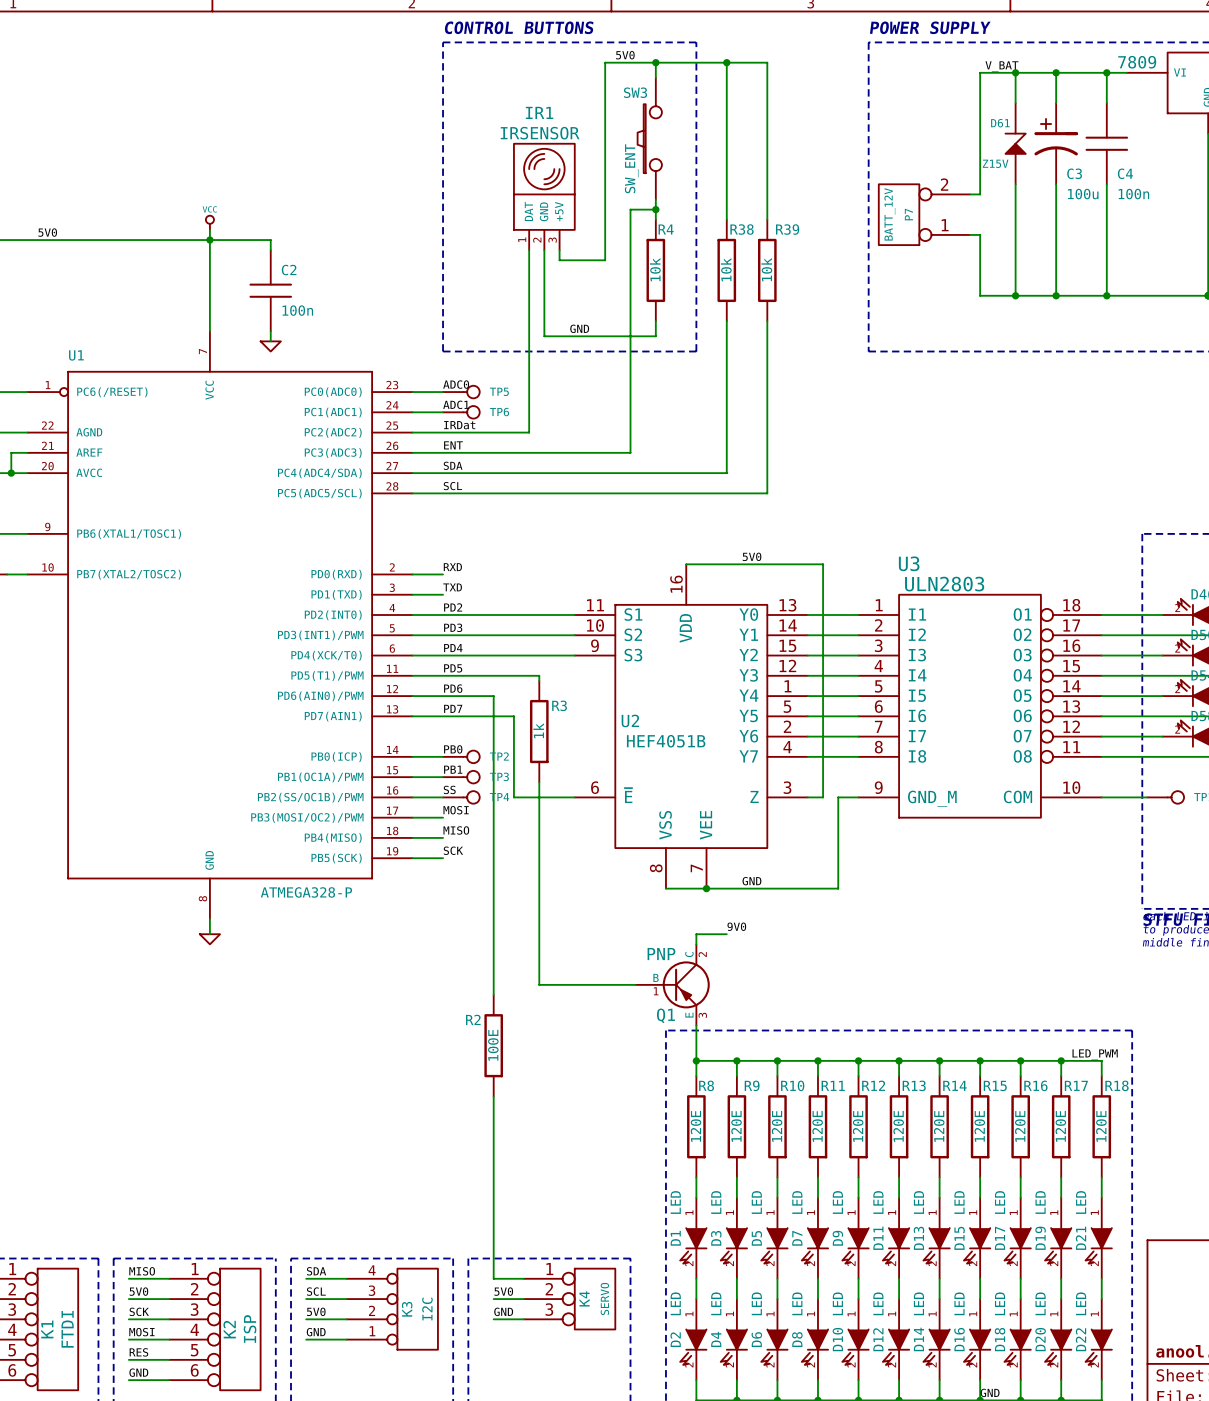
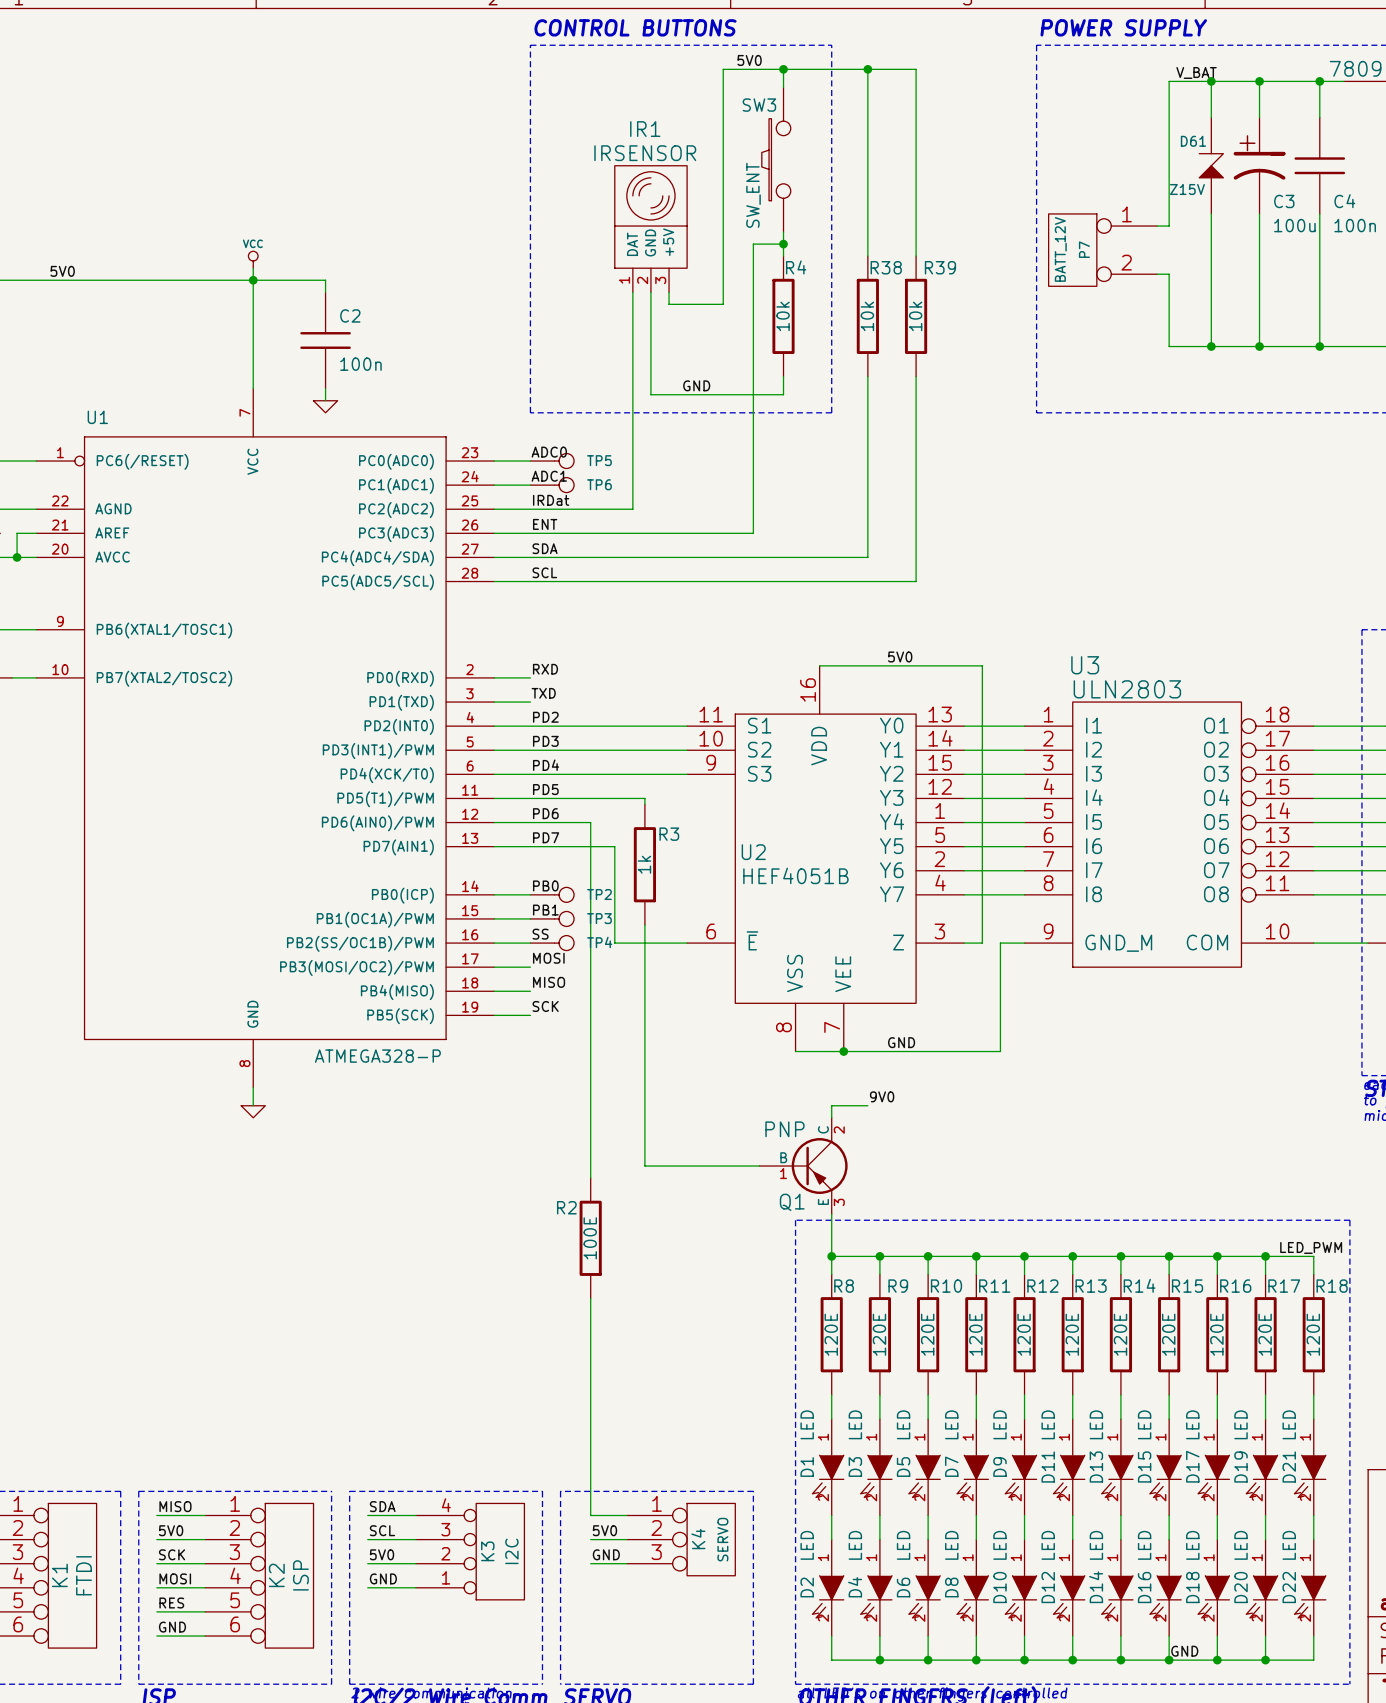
P7 flip: as is (899, 214) -> up-down (1072, 250)

